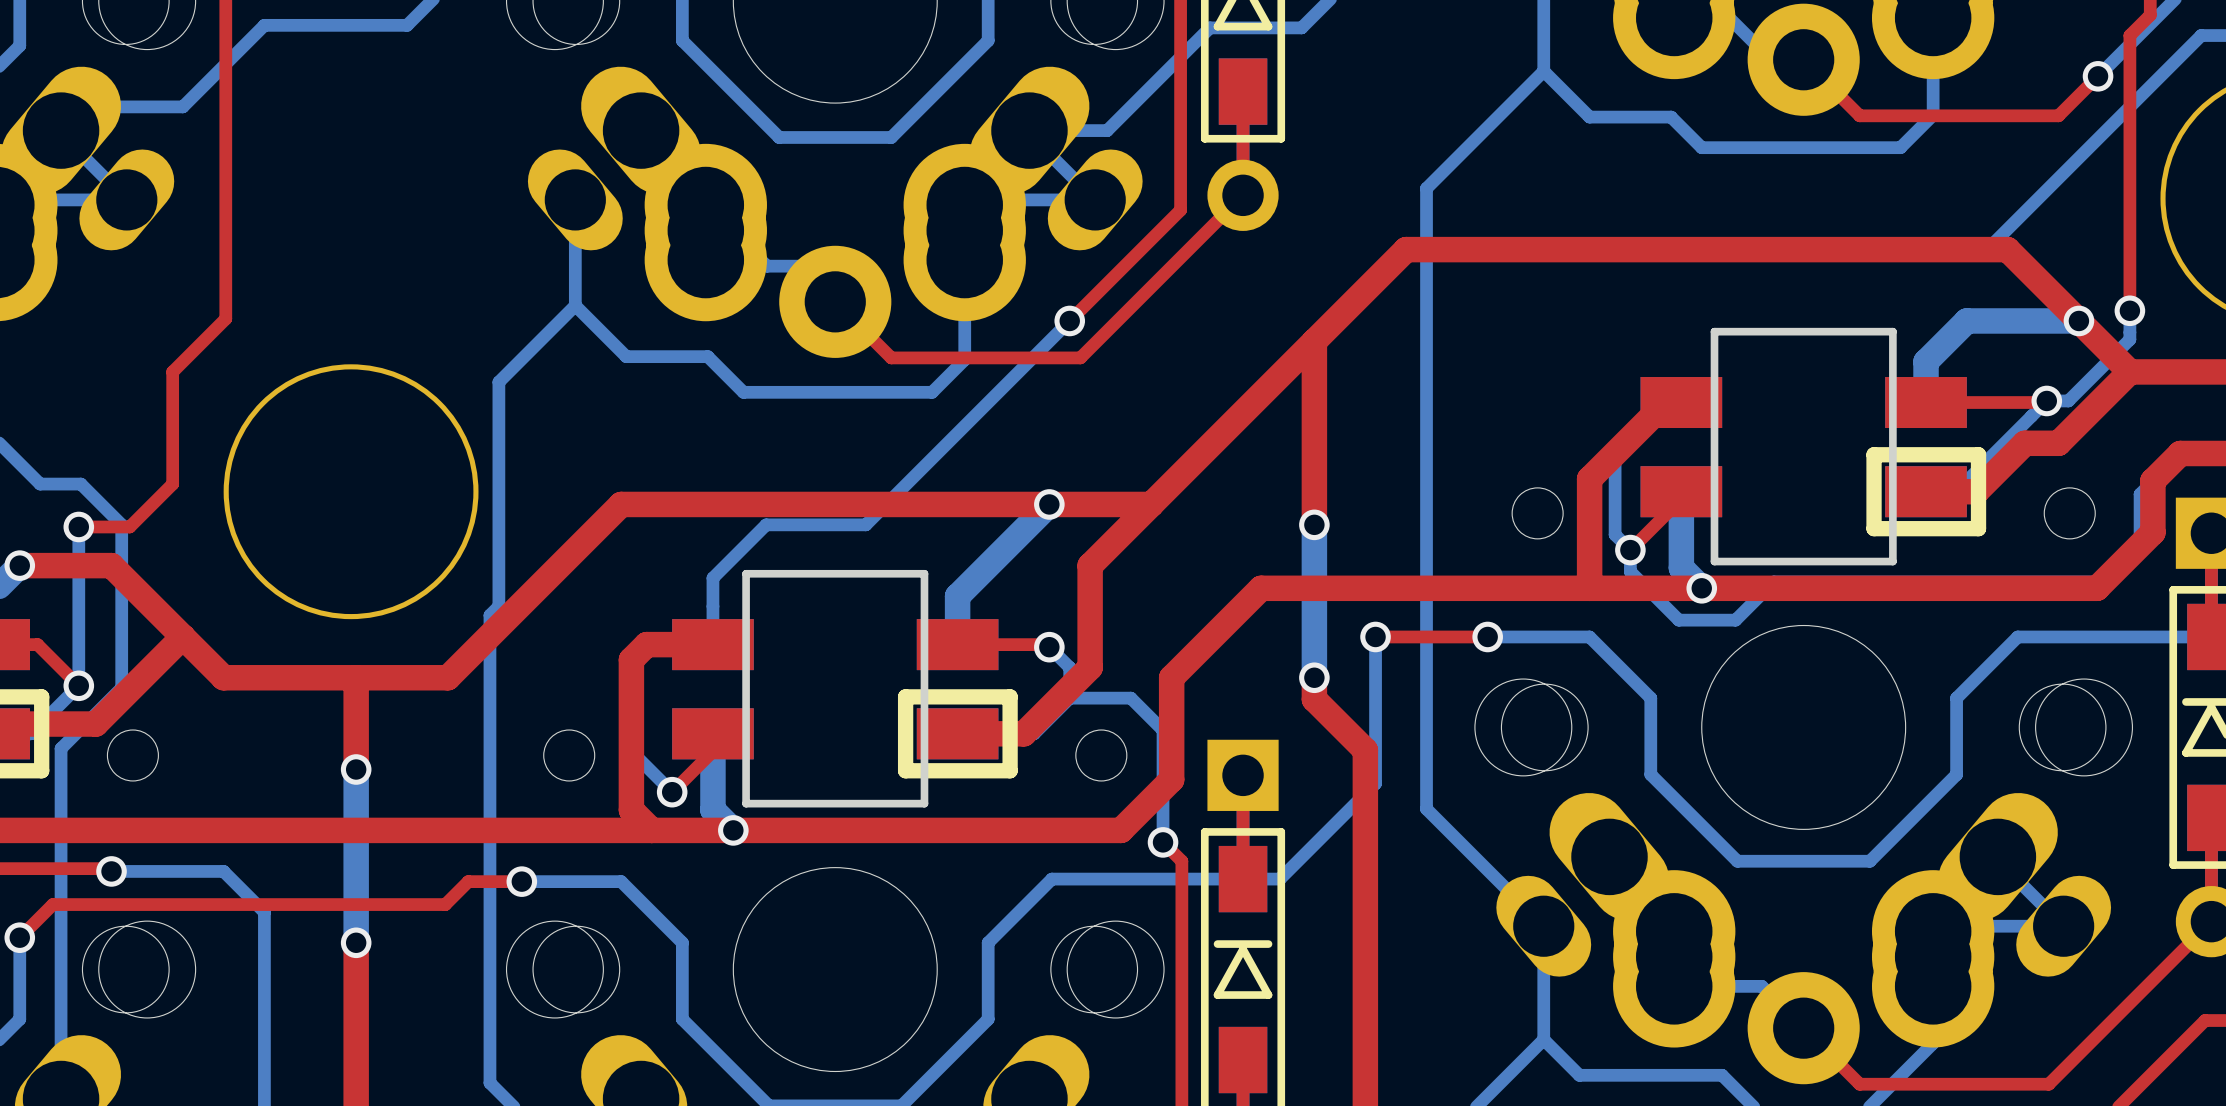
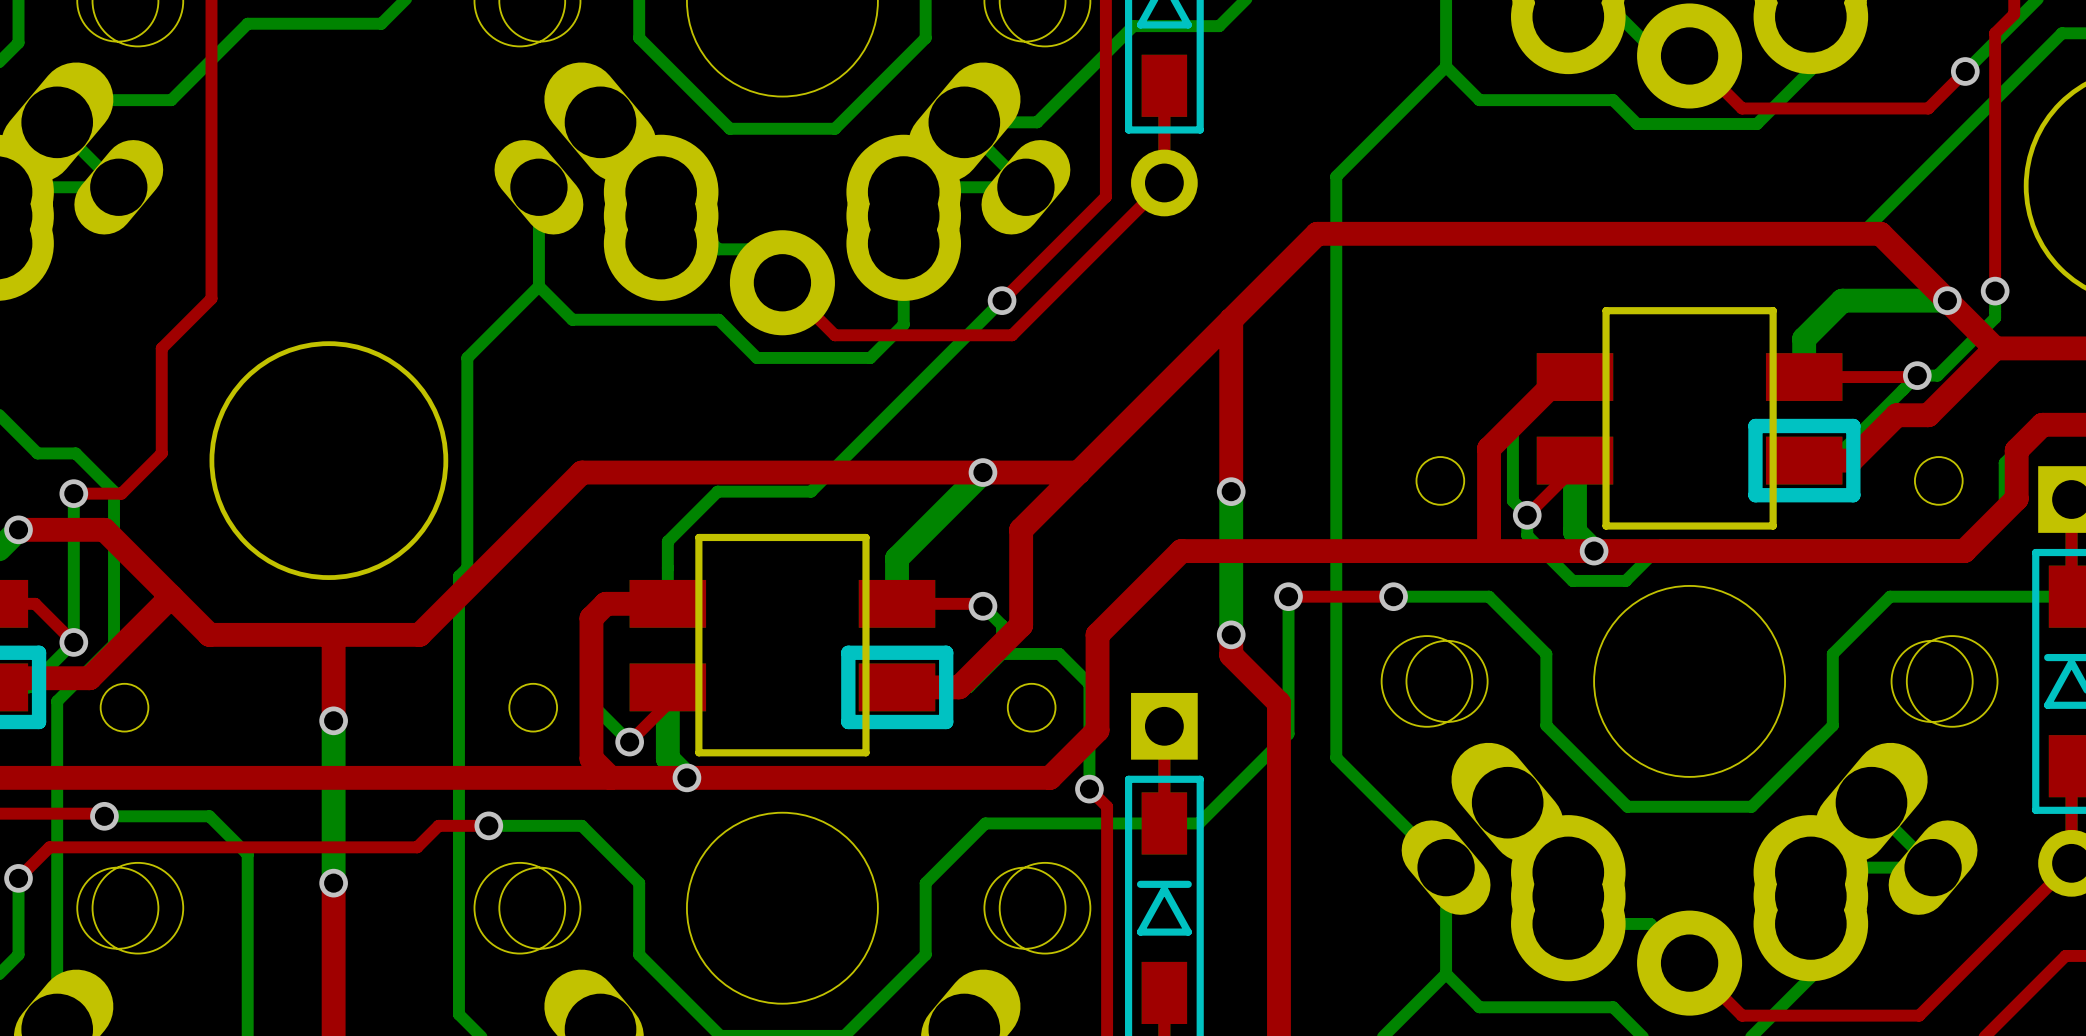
bottom track: (1933, 74) (1933, 115) (1900, 147) (1701, 147) (1671, 117) (1589, 117) (1579, 106) -> (1810, 70) (1756, 124) (1637, 124) (1613, 100) (1479, 100)
bottom track: (611, 341) (626, 356) (707, 356) (743, 392) (932, 392) (964, 359) (964, 346) -> (572, 319) (718, 319) (756, 357) (870, 357) (903, 324)

